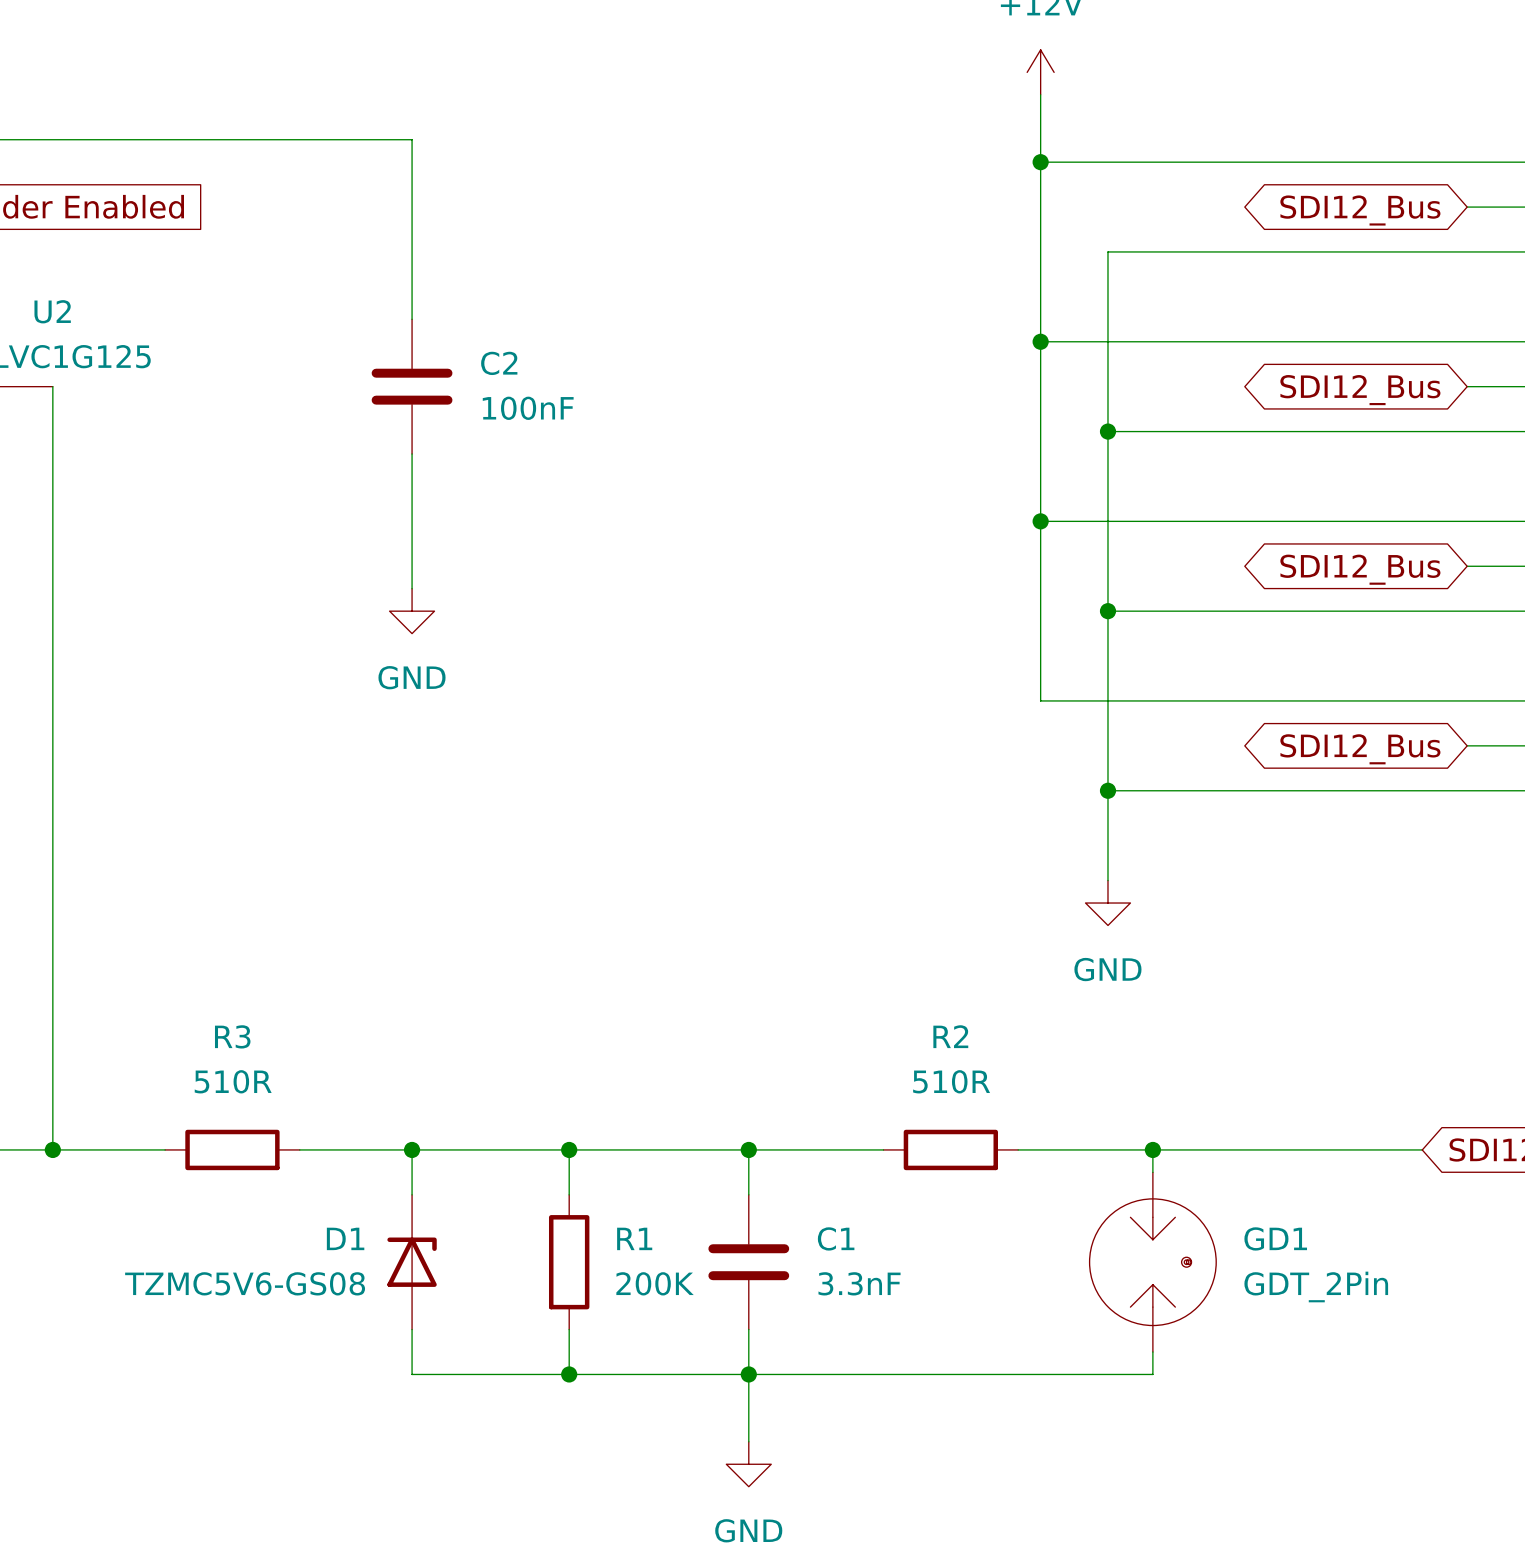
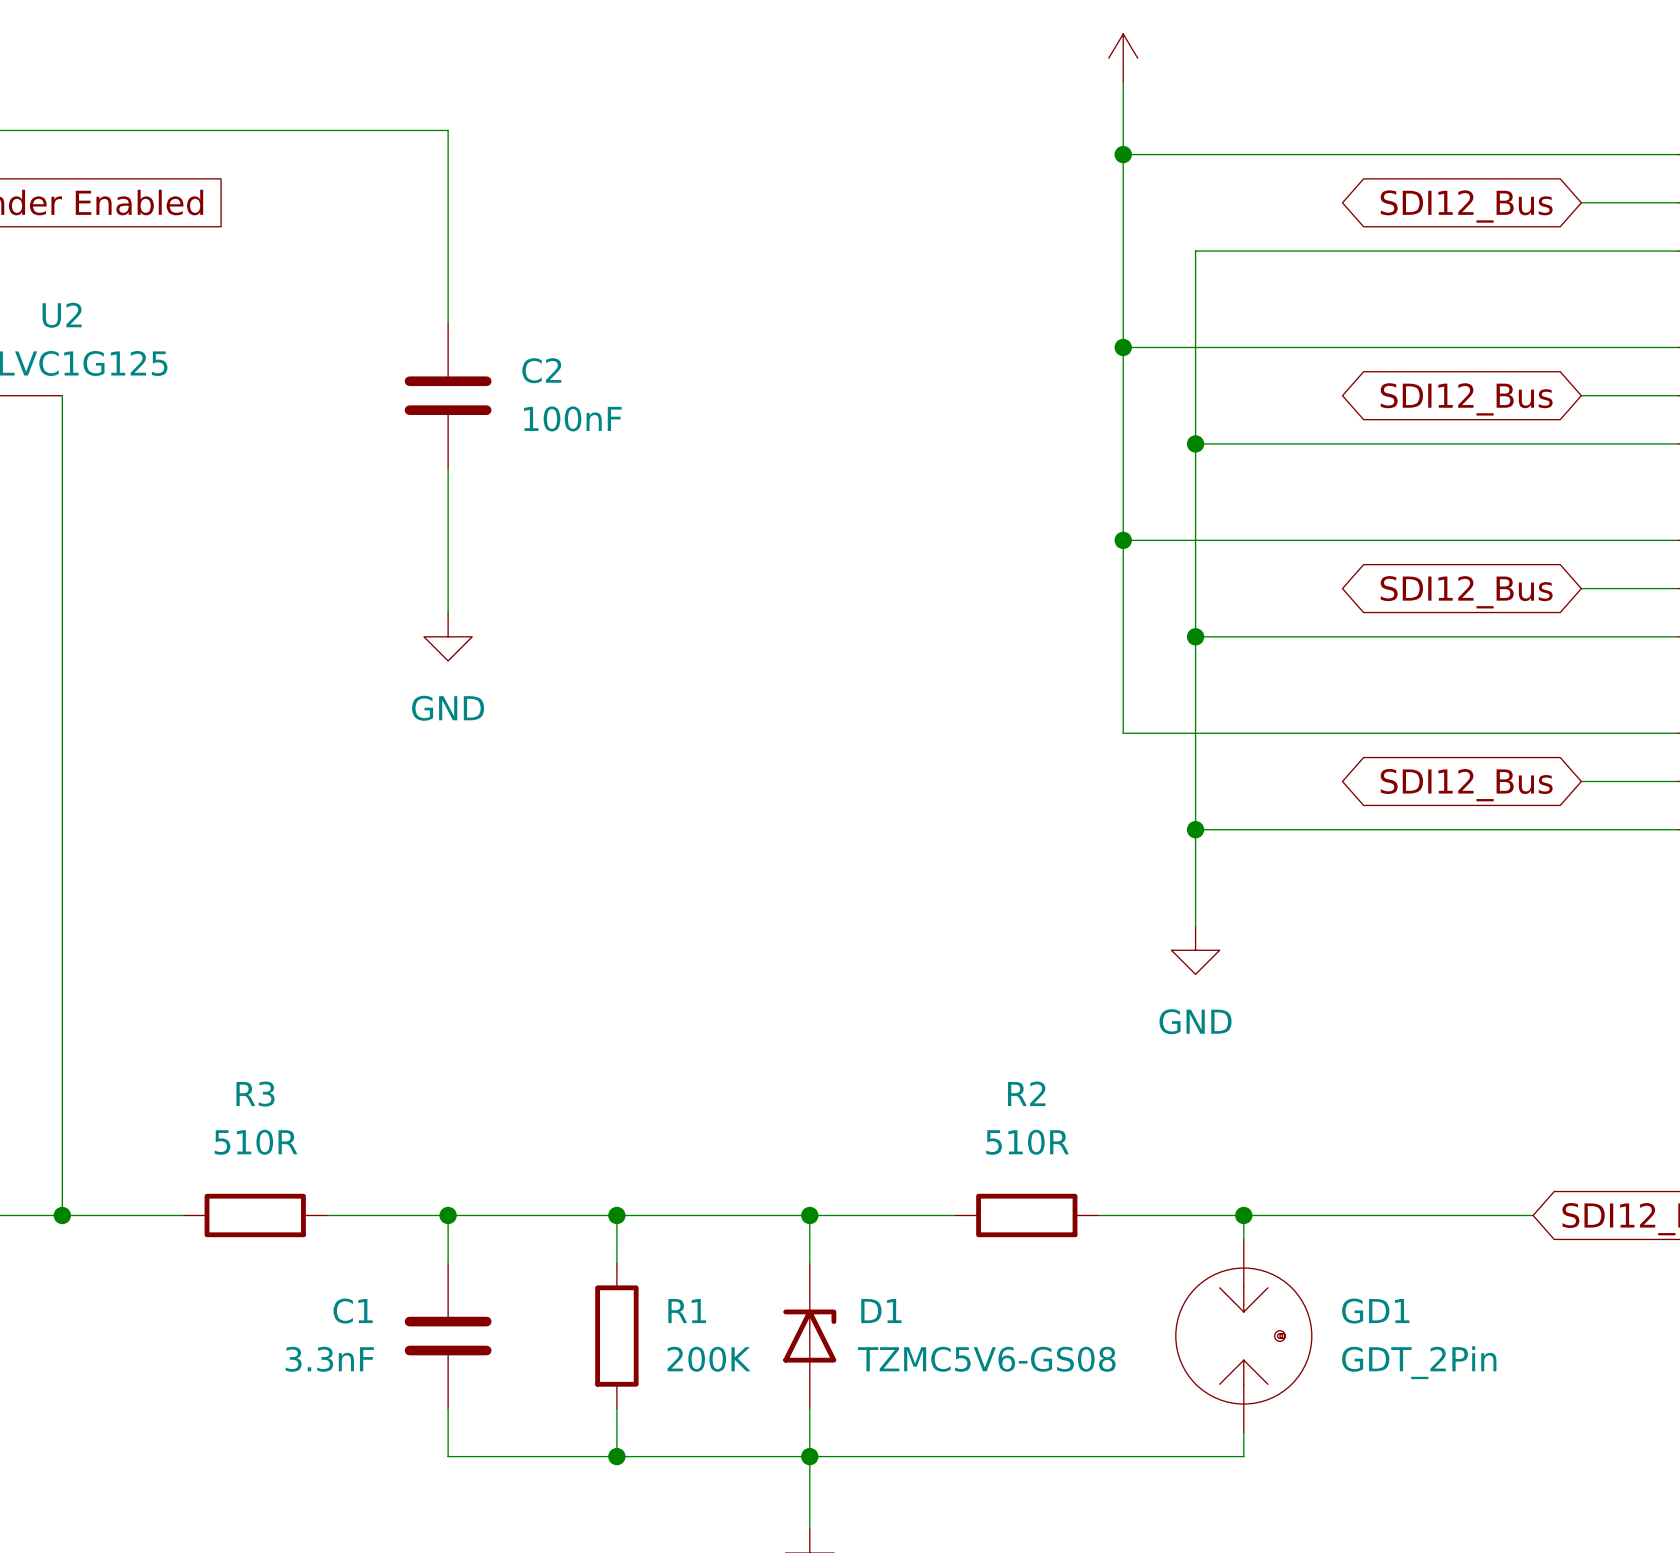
D1 name position: D1 (345, 1238) -> D1 (881, 1311)
C1 name position: C1 (836, 1238) -> C1 (353, 1311)
D1 position: (412, 1262) -> (809, 1336)
C1 position: (748, 1262) -> (448, 1336)
D1 value position: TZMC5V6-GS08 (245, 1283) -> TZMC5V6-GS08 (986, 1359)
C1 value position: 3.3nF (859, 1283) -> 3.3nF (329, 1359)

